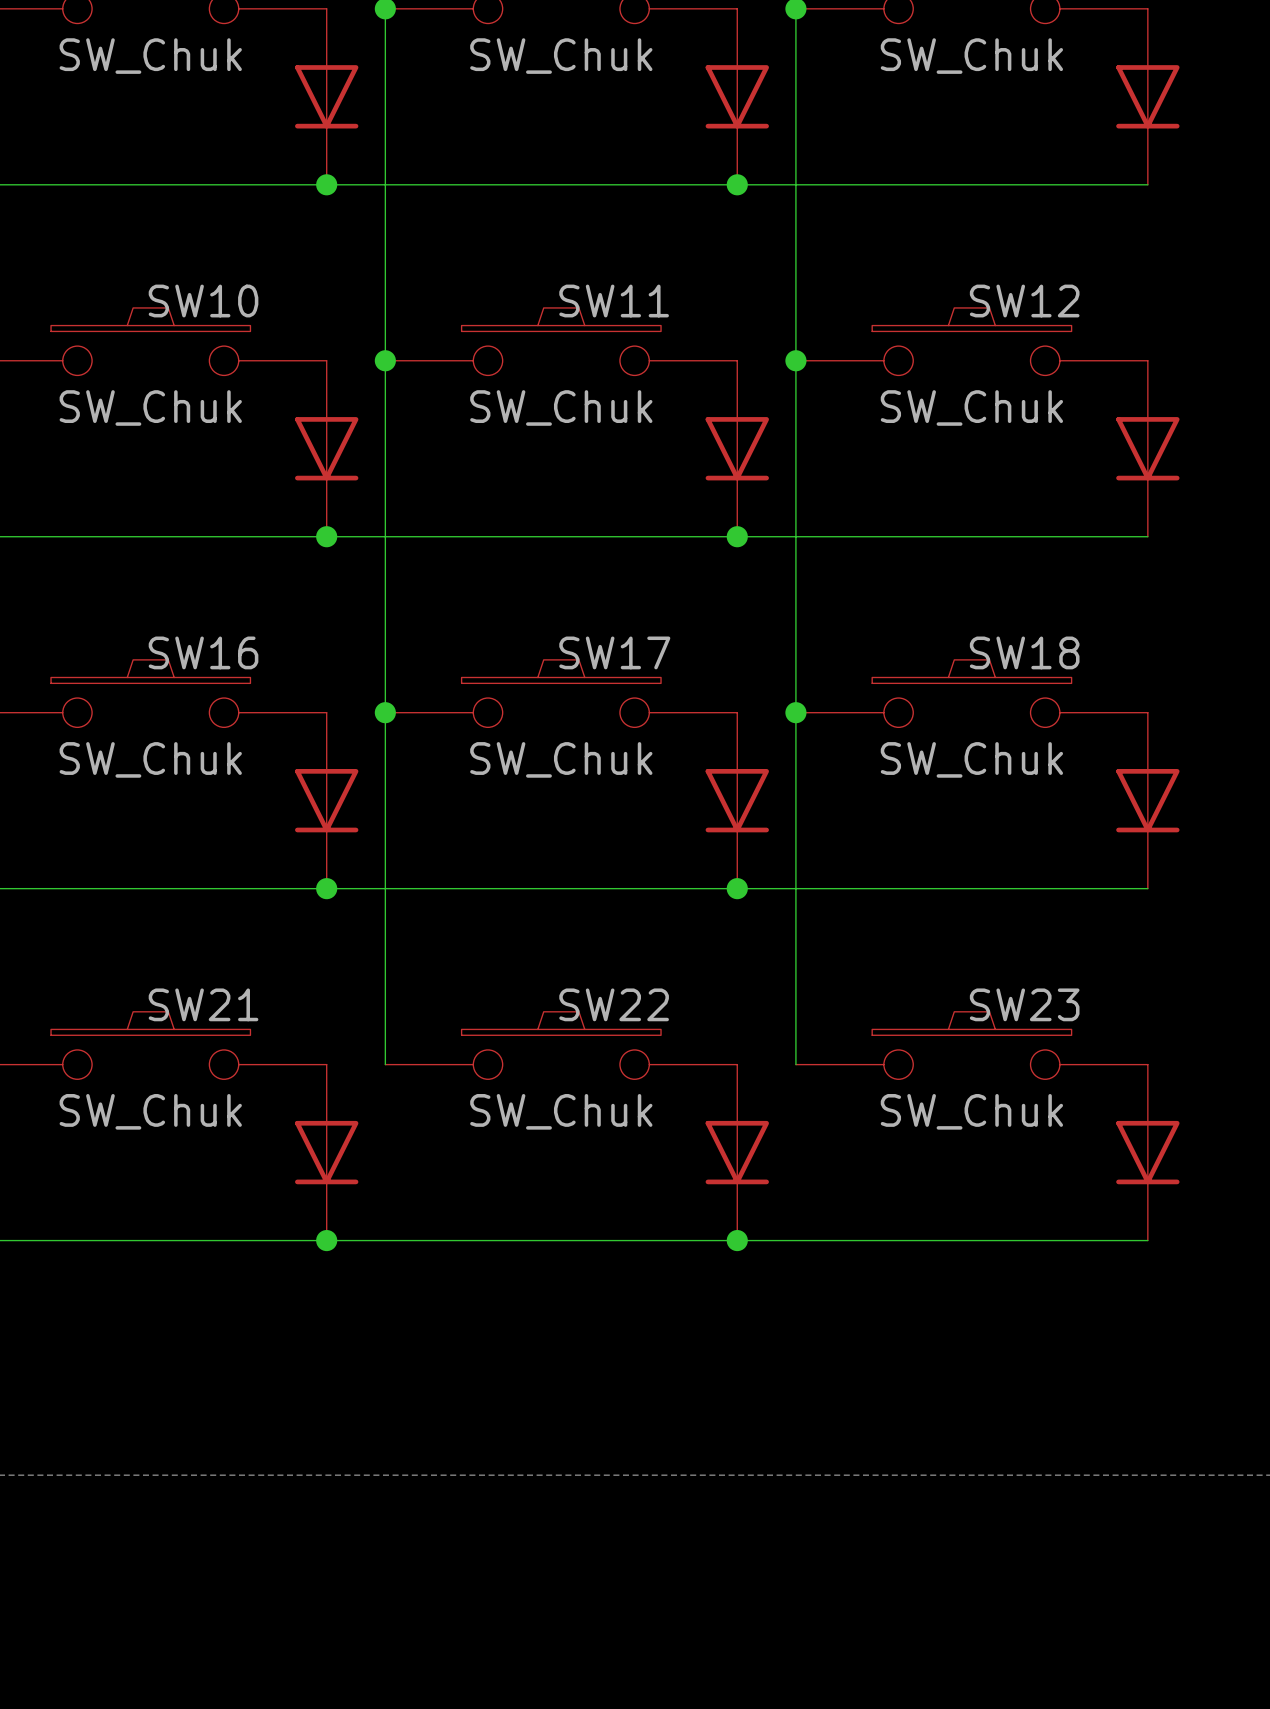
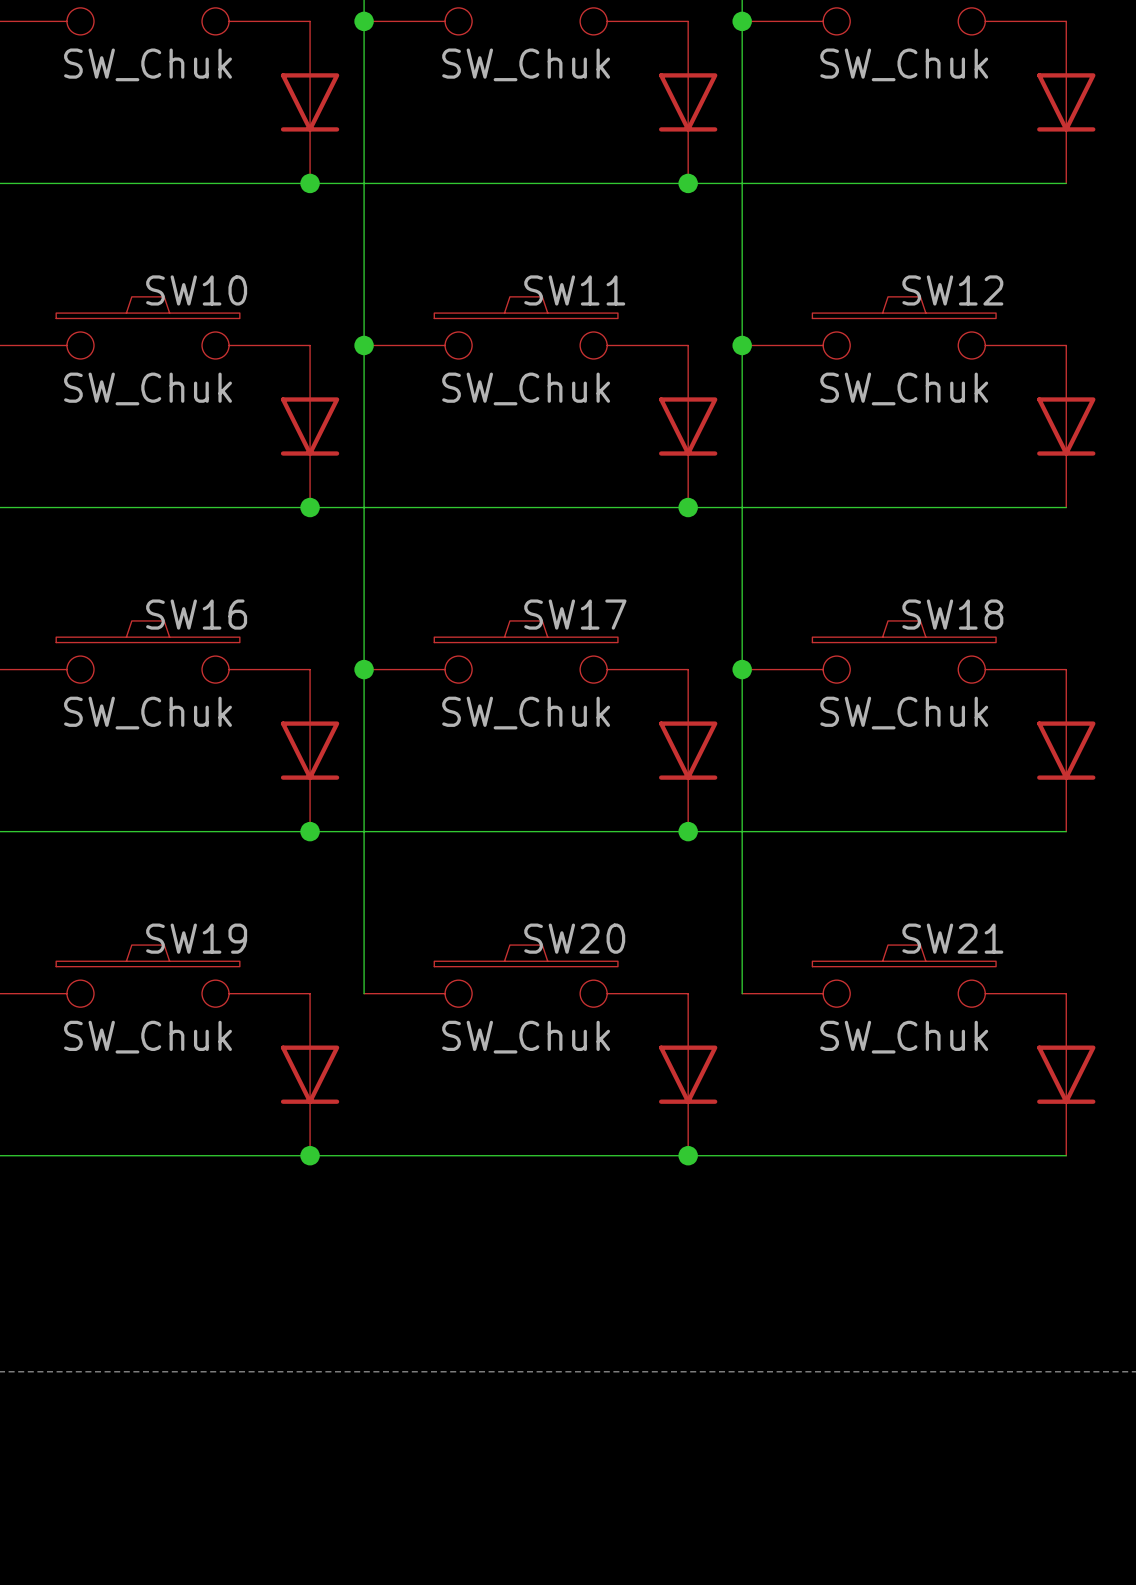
SW21 name: SW21 (203, 1004) -> SW19 (196, 938)
SW22 name: SW22 (614, 1004) -> SW20 (574, 938)
SW23 name: SW23 (1024, 1004) -> SW21 (952, 938)

